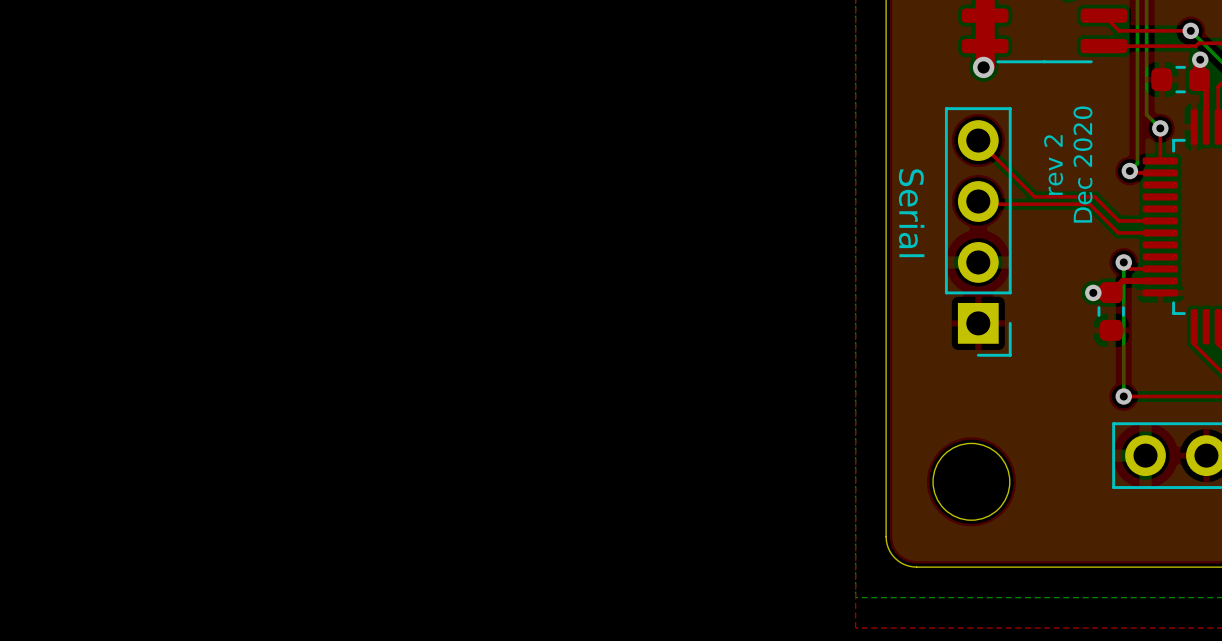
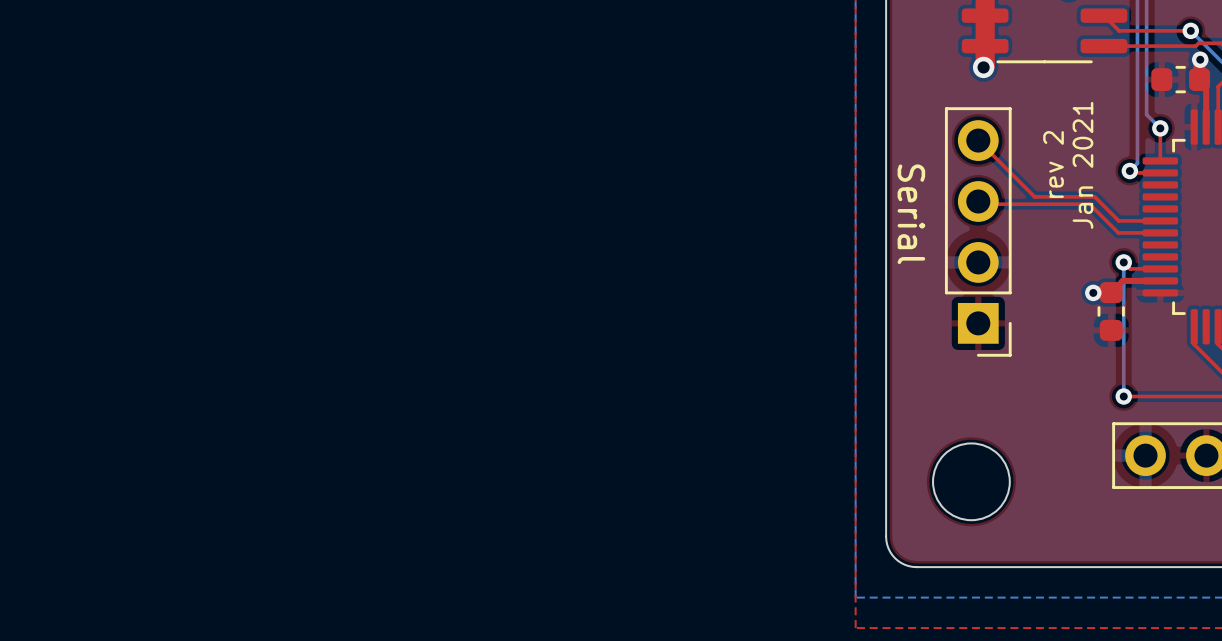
text: Dec 2020 (1082, 164) -> Jan 2021 (1082, 165)

